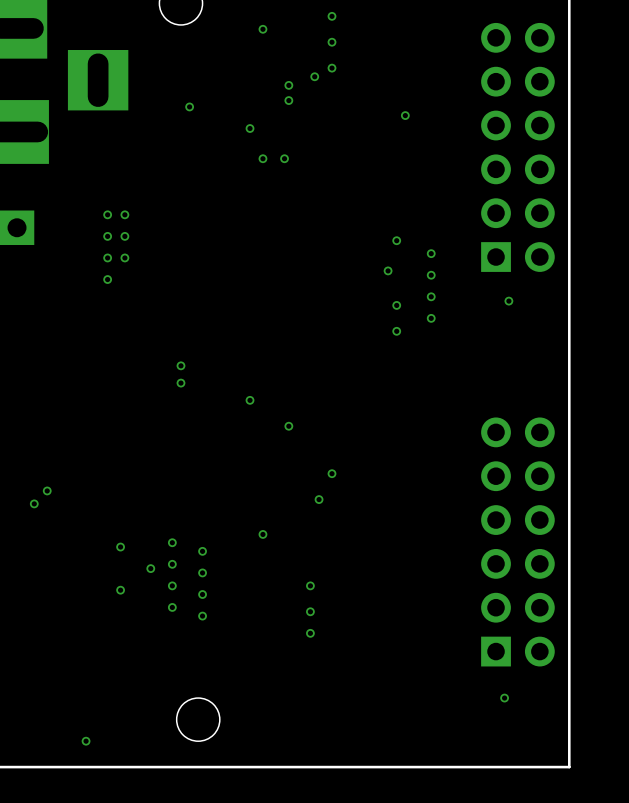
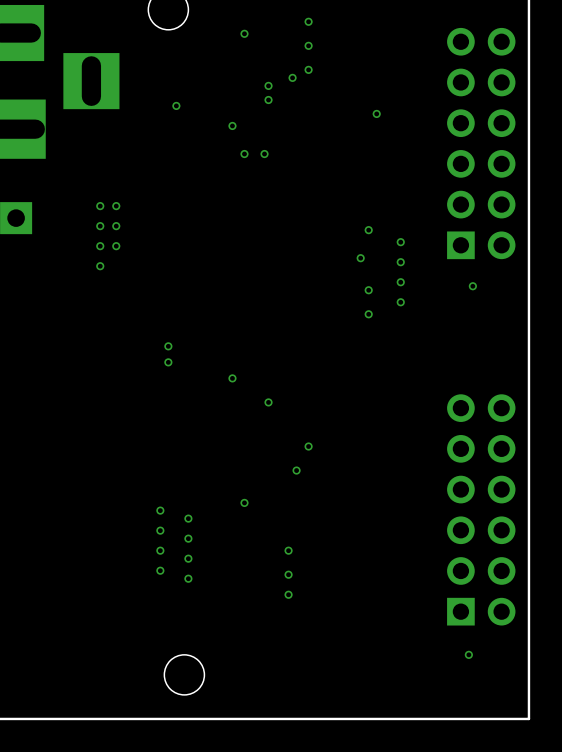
via: (47, 490) -> none
via: (34, 503) -> none
via: (120, 547) -> none
via: (150, 568) -> none
via: (120, 590) -> none
via: (86, 741) -> none

